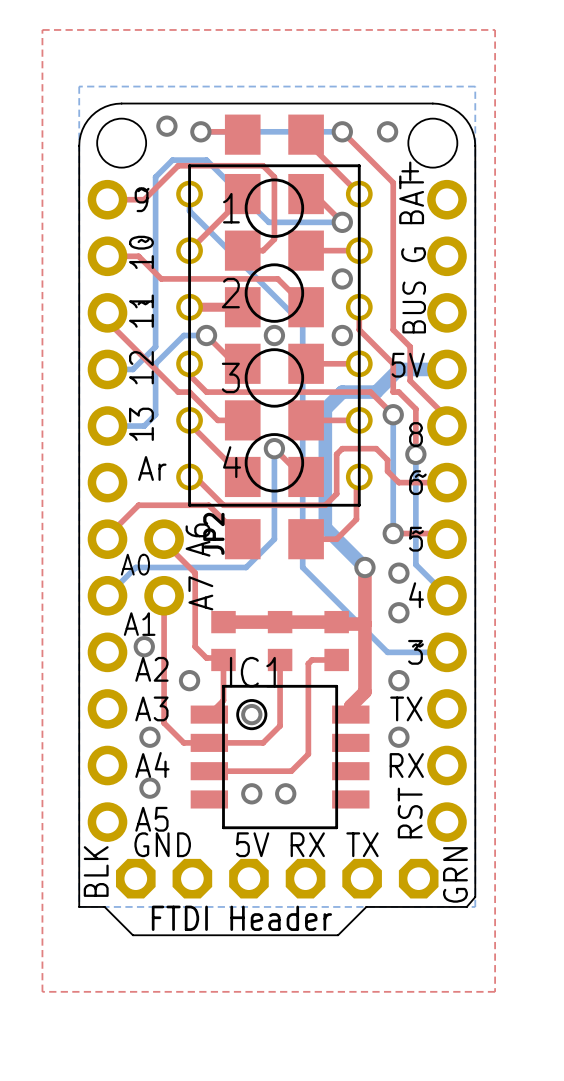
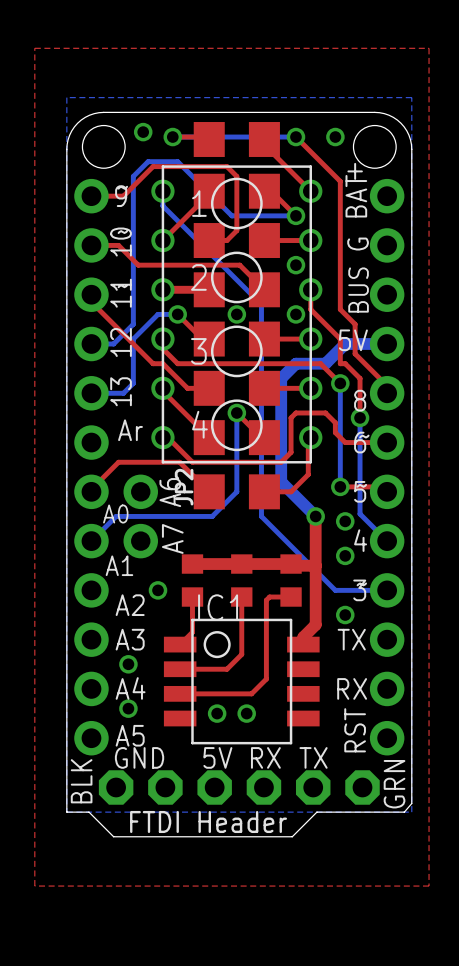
top track: (164, 539) (164, 542) (195, 573) (195, 646) (206, 658) (221, 658) (223, 659) -> none
top track: (164, 595) (164, 723) (183, 742) (209, 742) -> none
via: (144, 646) -> none
via: none -> (158, 590)
via: (189, 680) -> none
via: (251, 714) -> none
via: (398, 737) -> none

